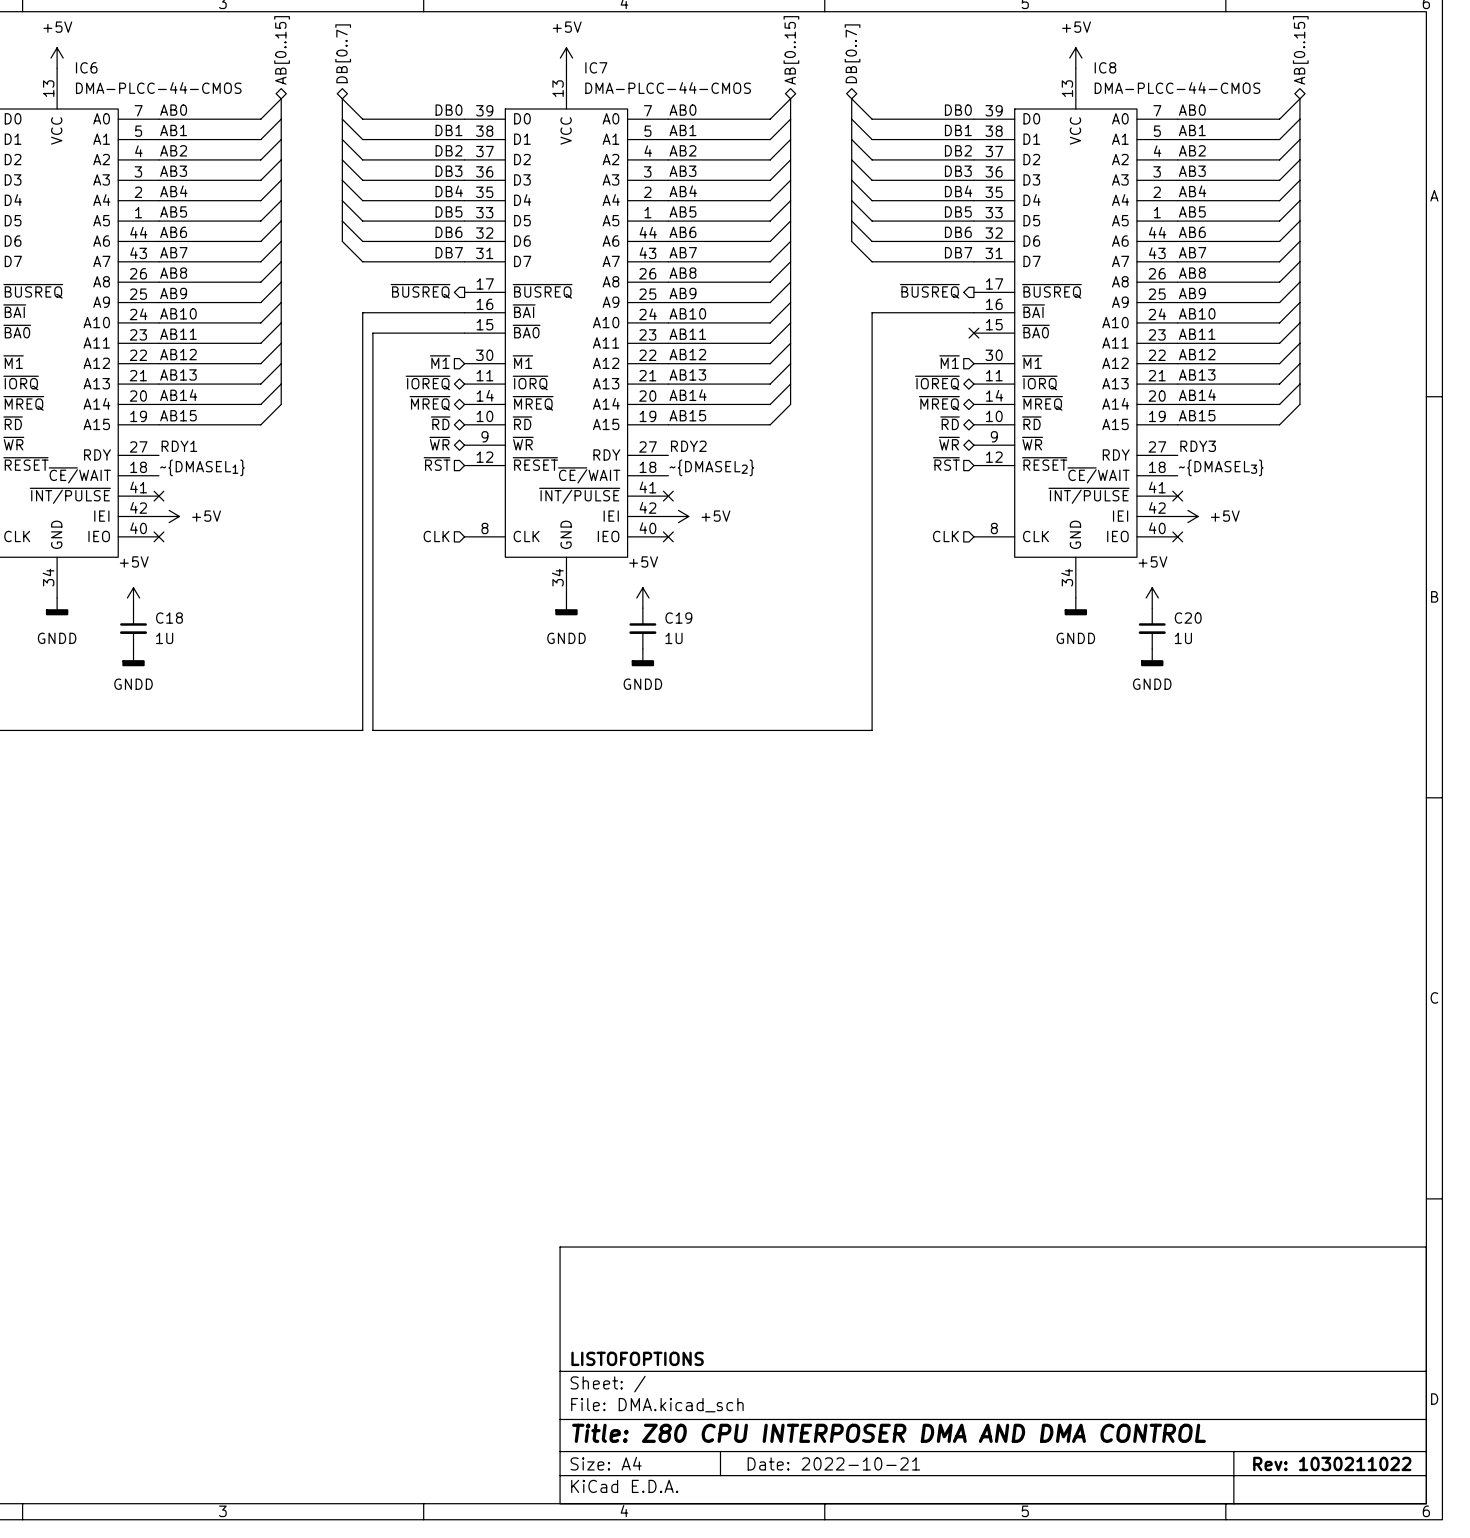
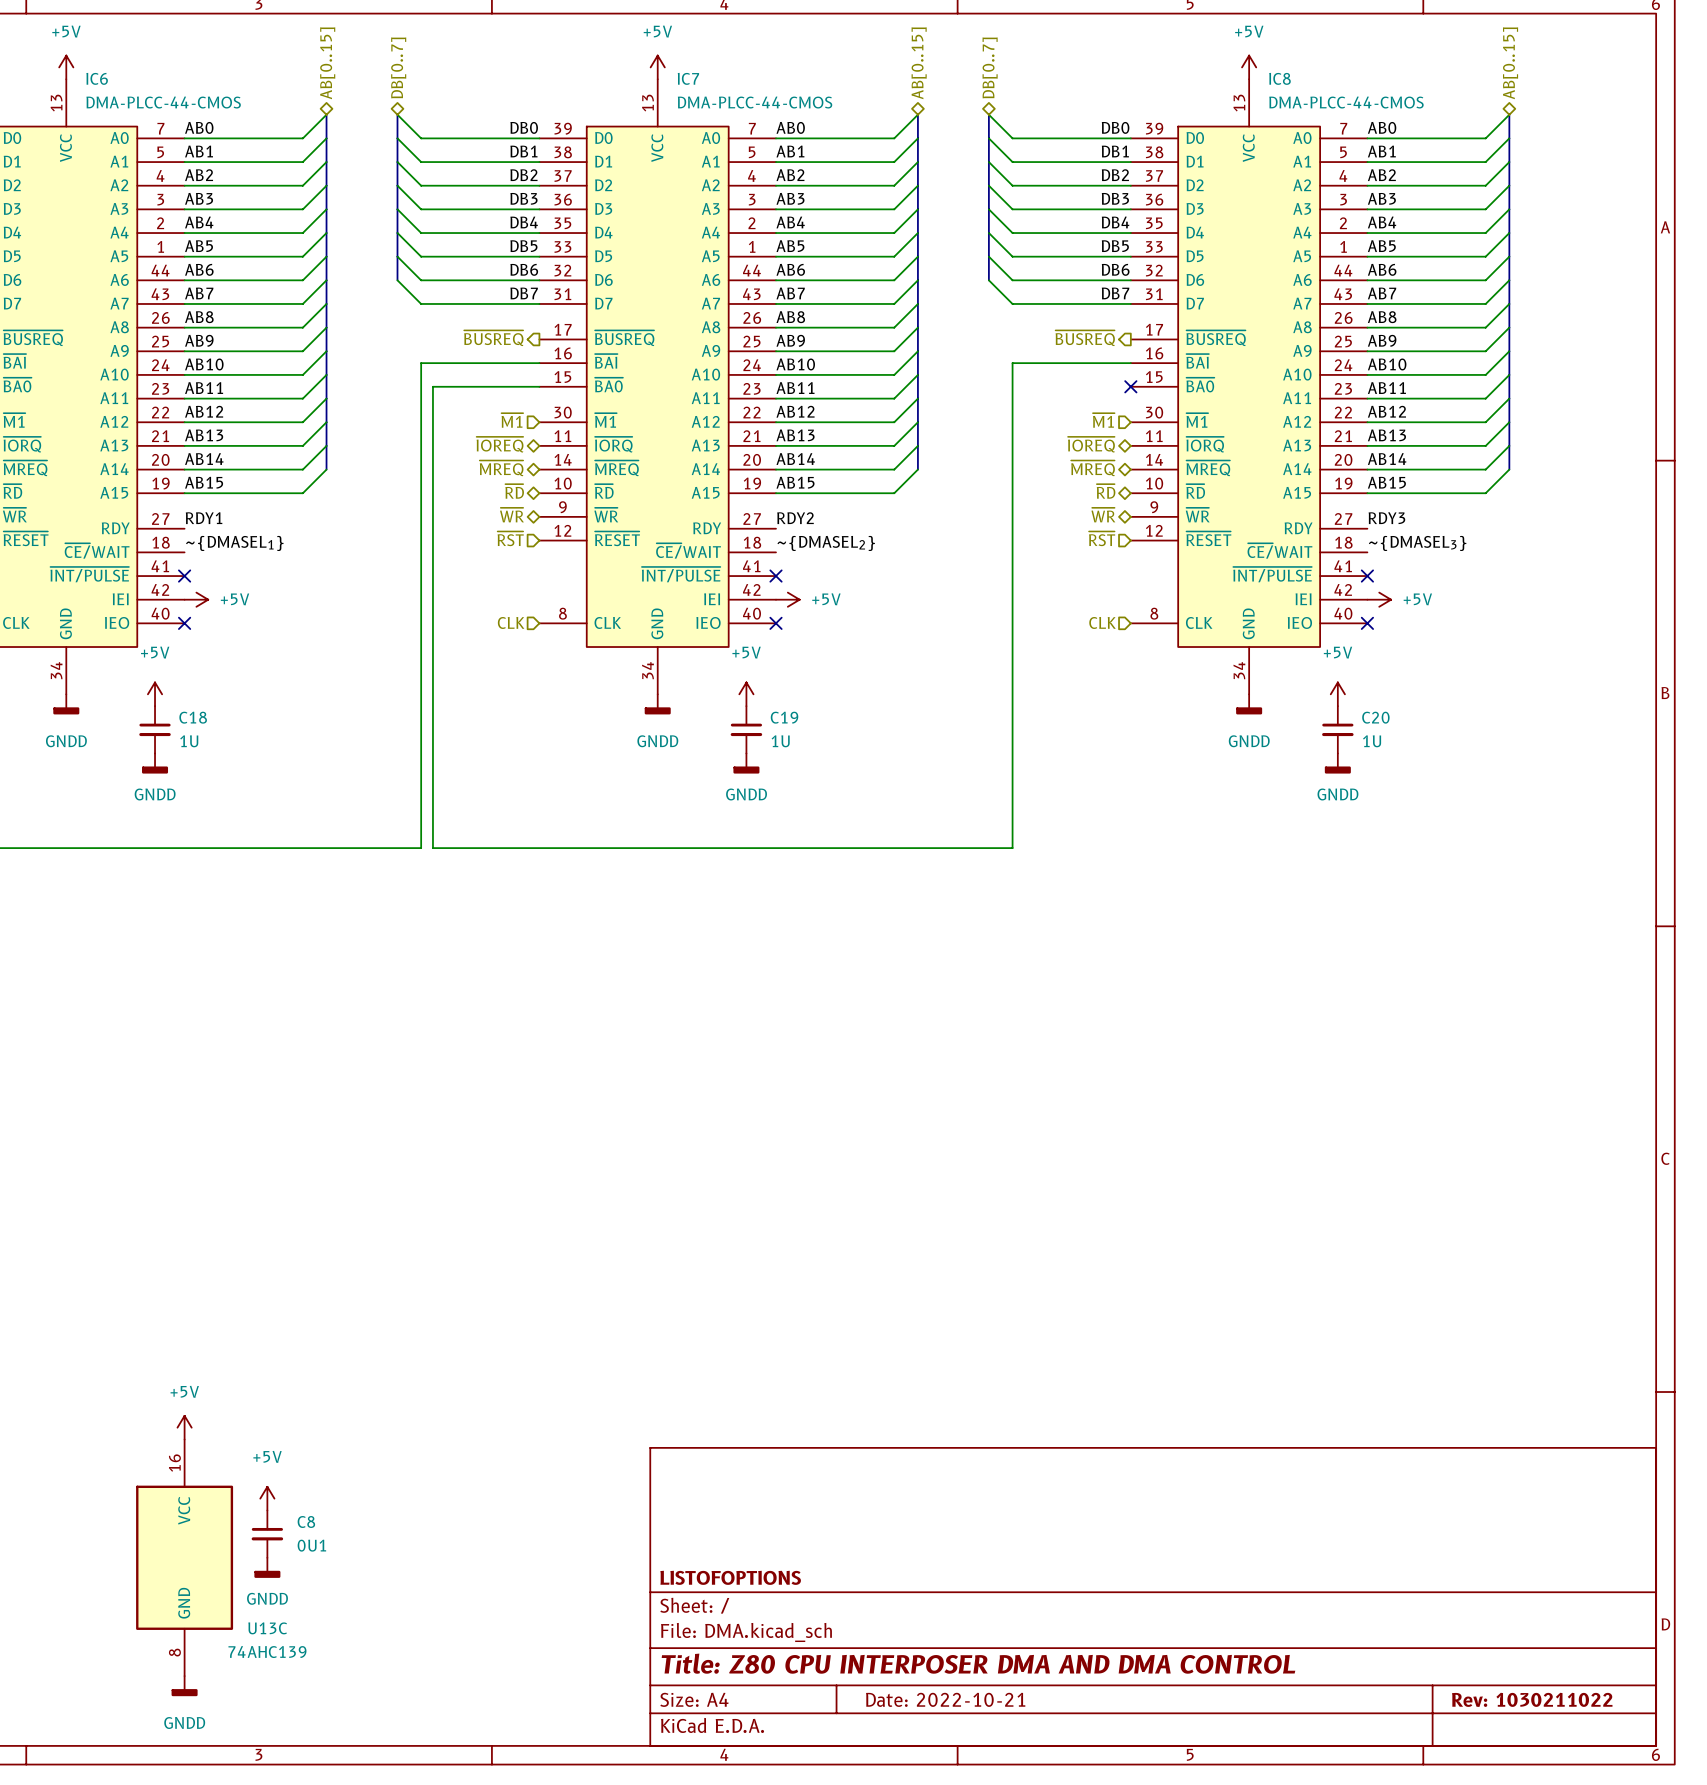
power symbol: none -> +5V (184, 1427)
power symbol: none -> +5V (267, 1498)
C8: none -> 0U1 (267, 1534)
U13C: none -> 74AHC139 (184, 1557)
power symbol: none -> GNDD (267, 1567)
power symbol: none -> GNDD (184, 1686)

